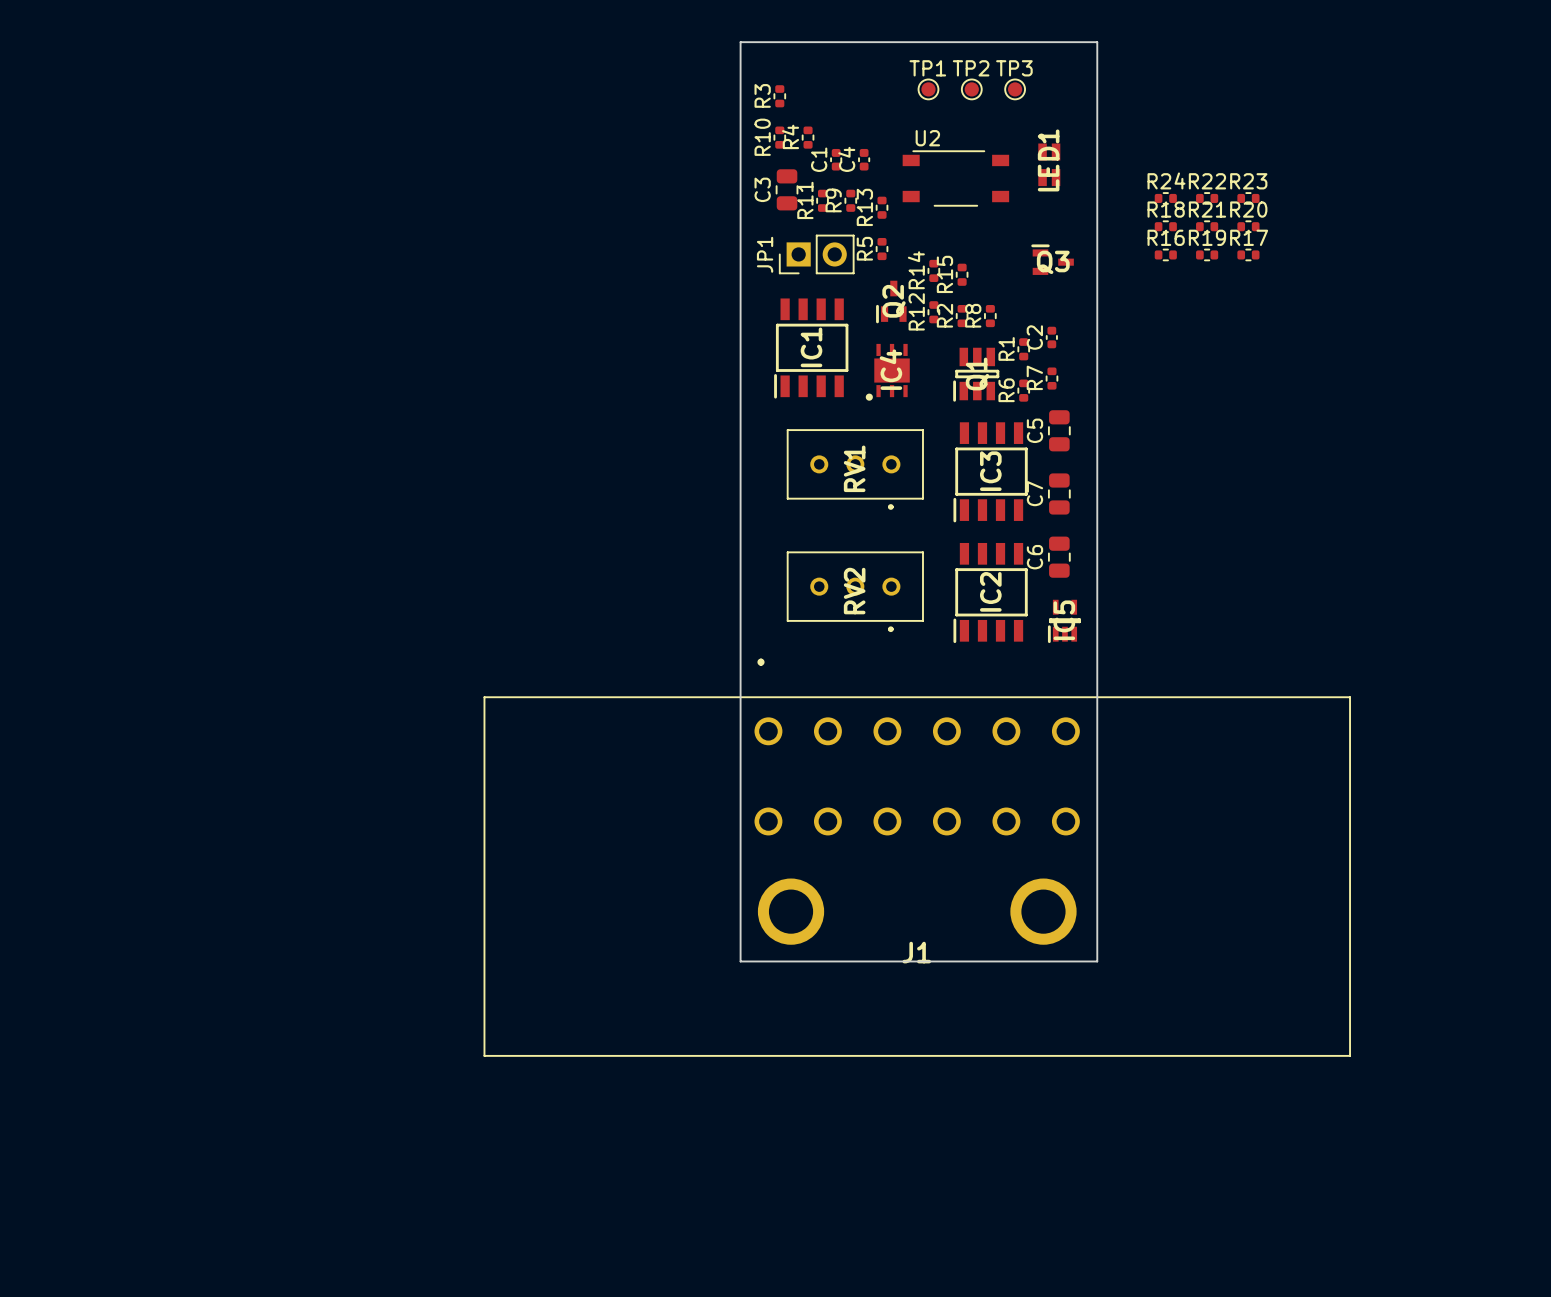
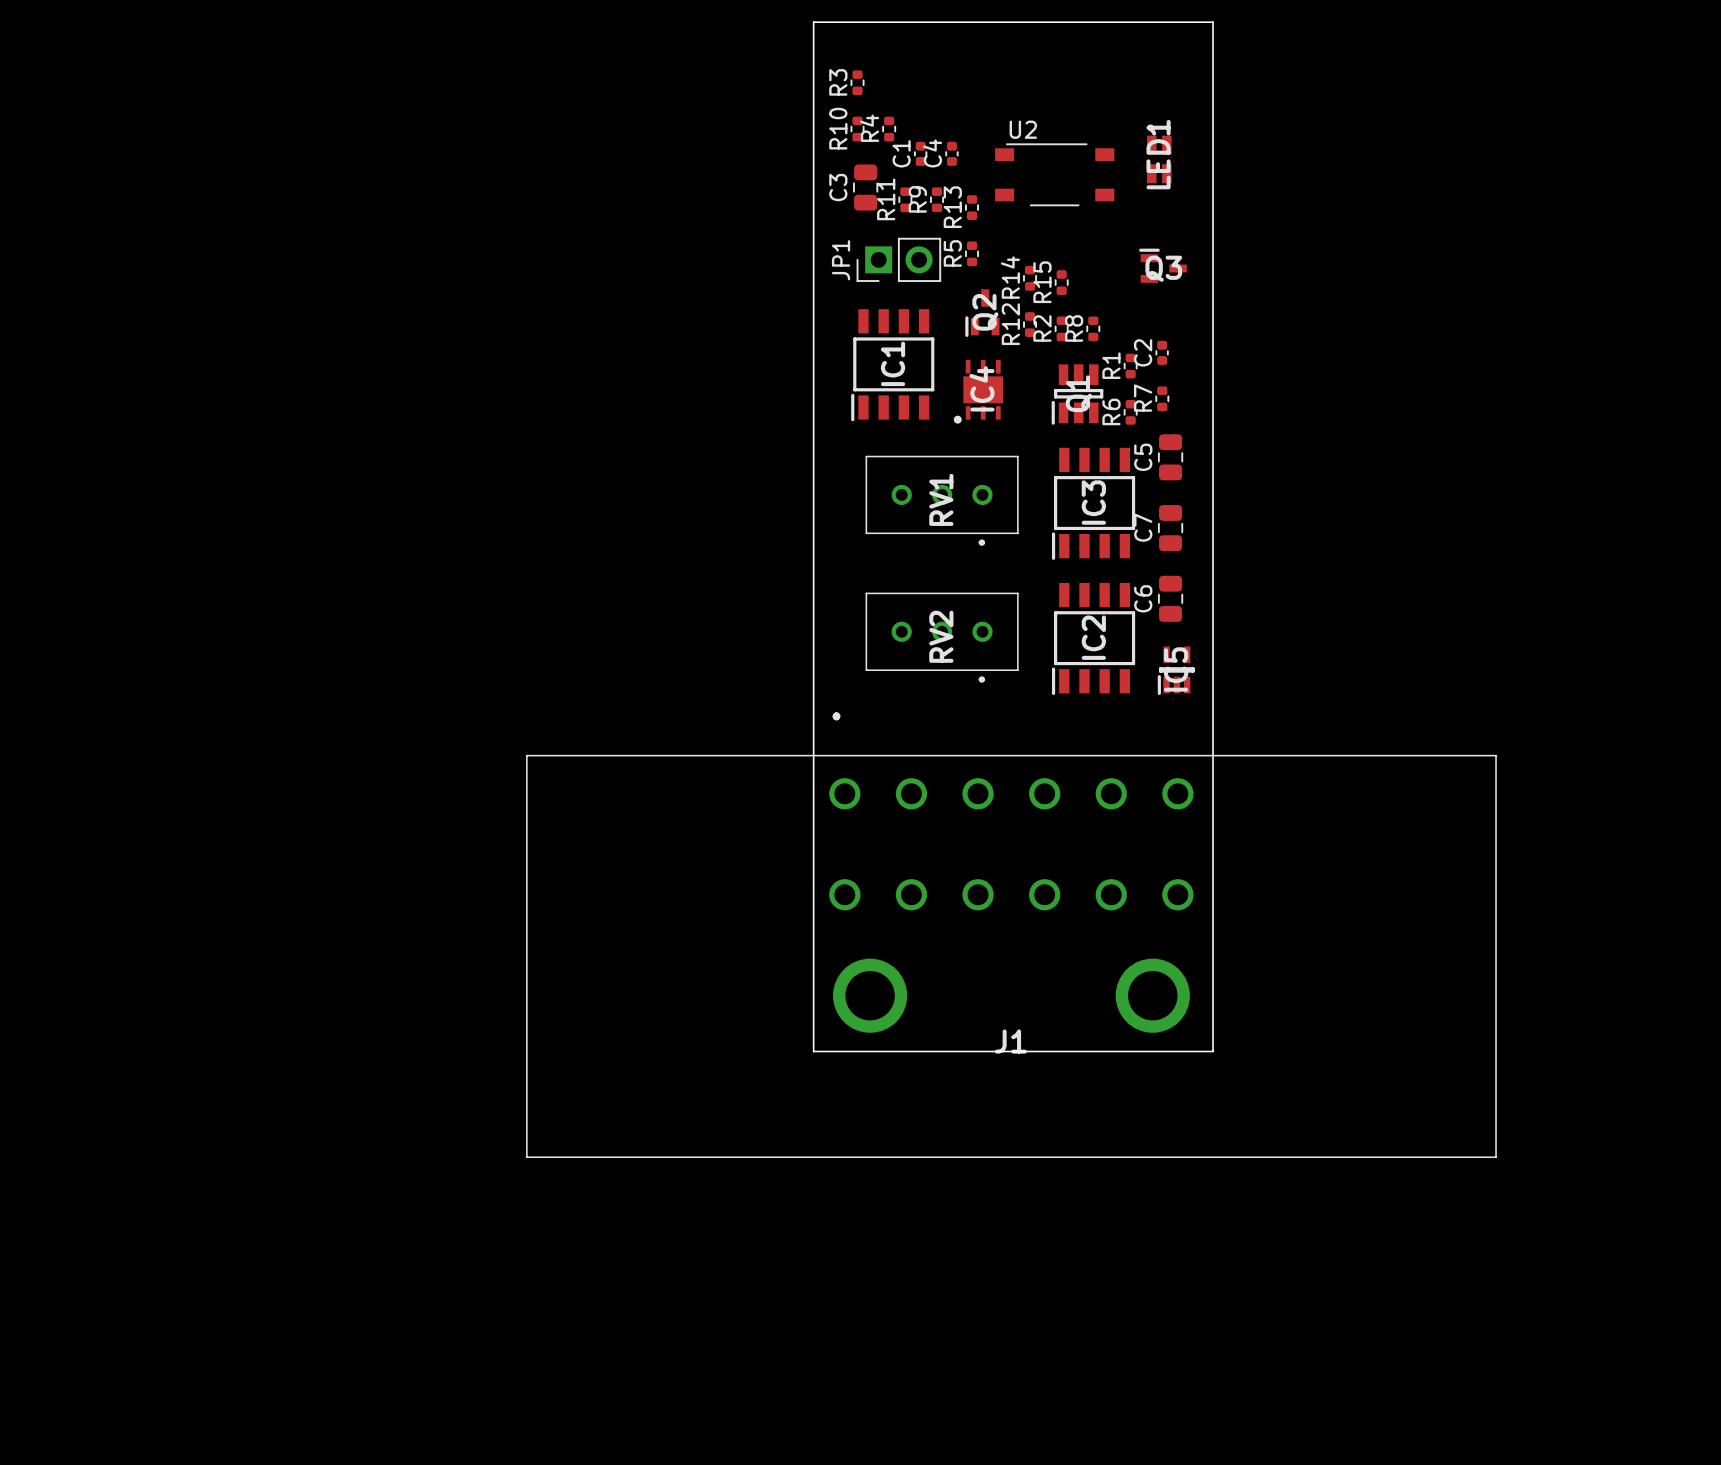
TP1: (928, 89) -> none
TP2: (971, 89) -> none
TP3: (1015, 89) -> none
R24: (1165, 198) -> none
R22: (1207, 198) -> none
R23: (1248, 198) -> none
R18: (1165, 226) -> none
R21: (1207, 226) -> none
R20: (1248, 226) -> none
R16: (1165, 254) -> none
R19: (1207, 254) -> none
R17: (1248, 254) -> none

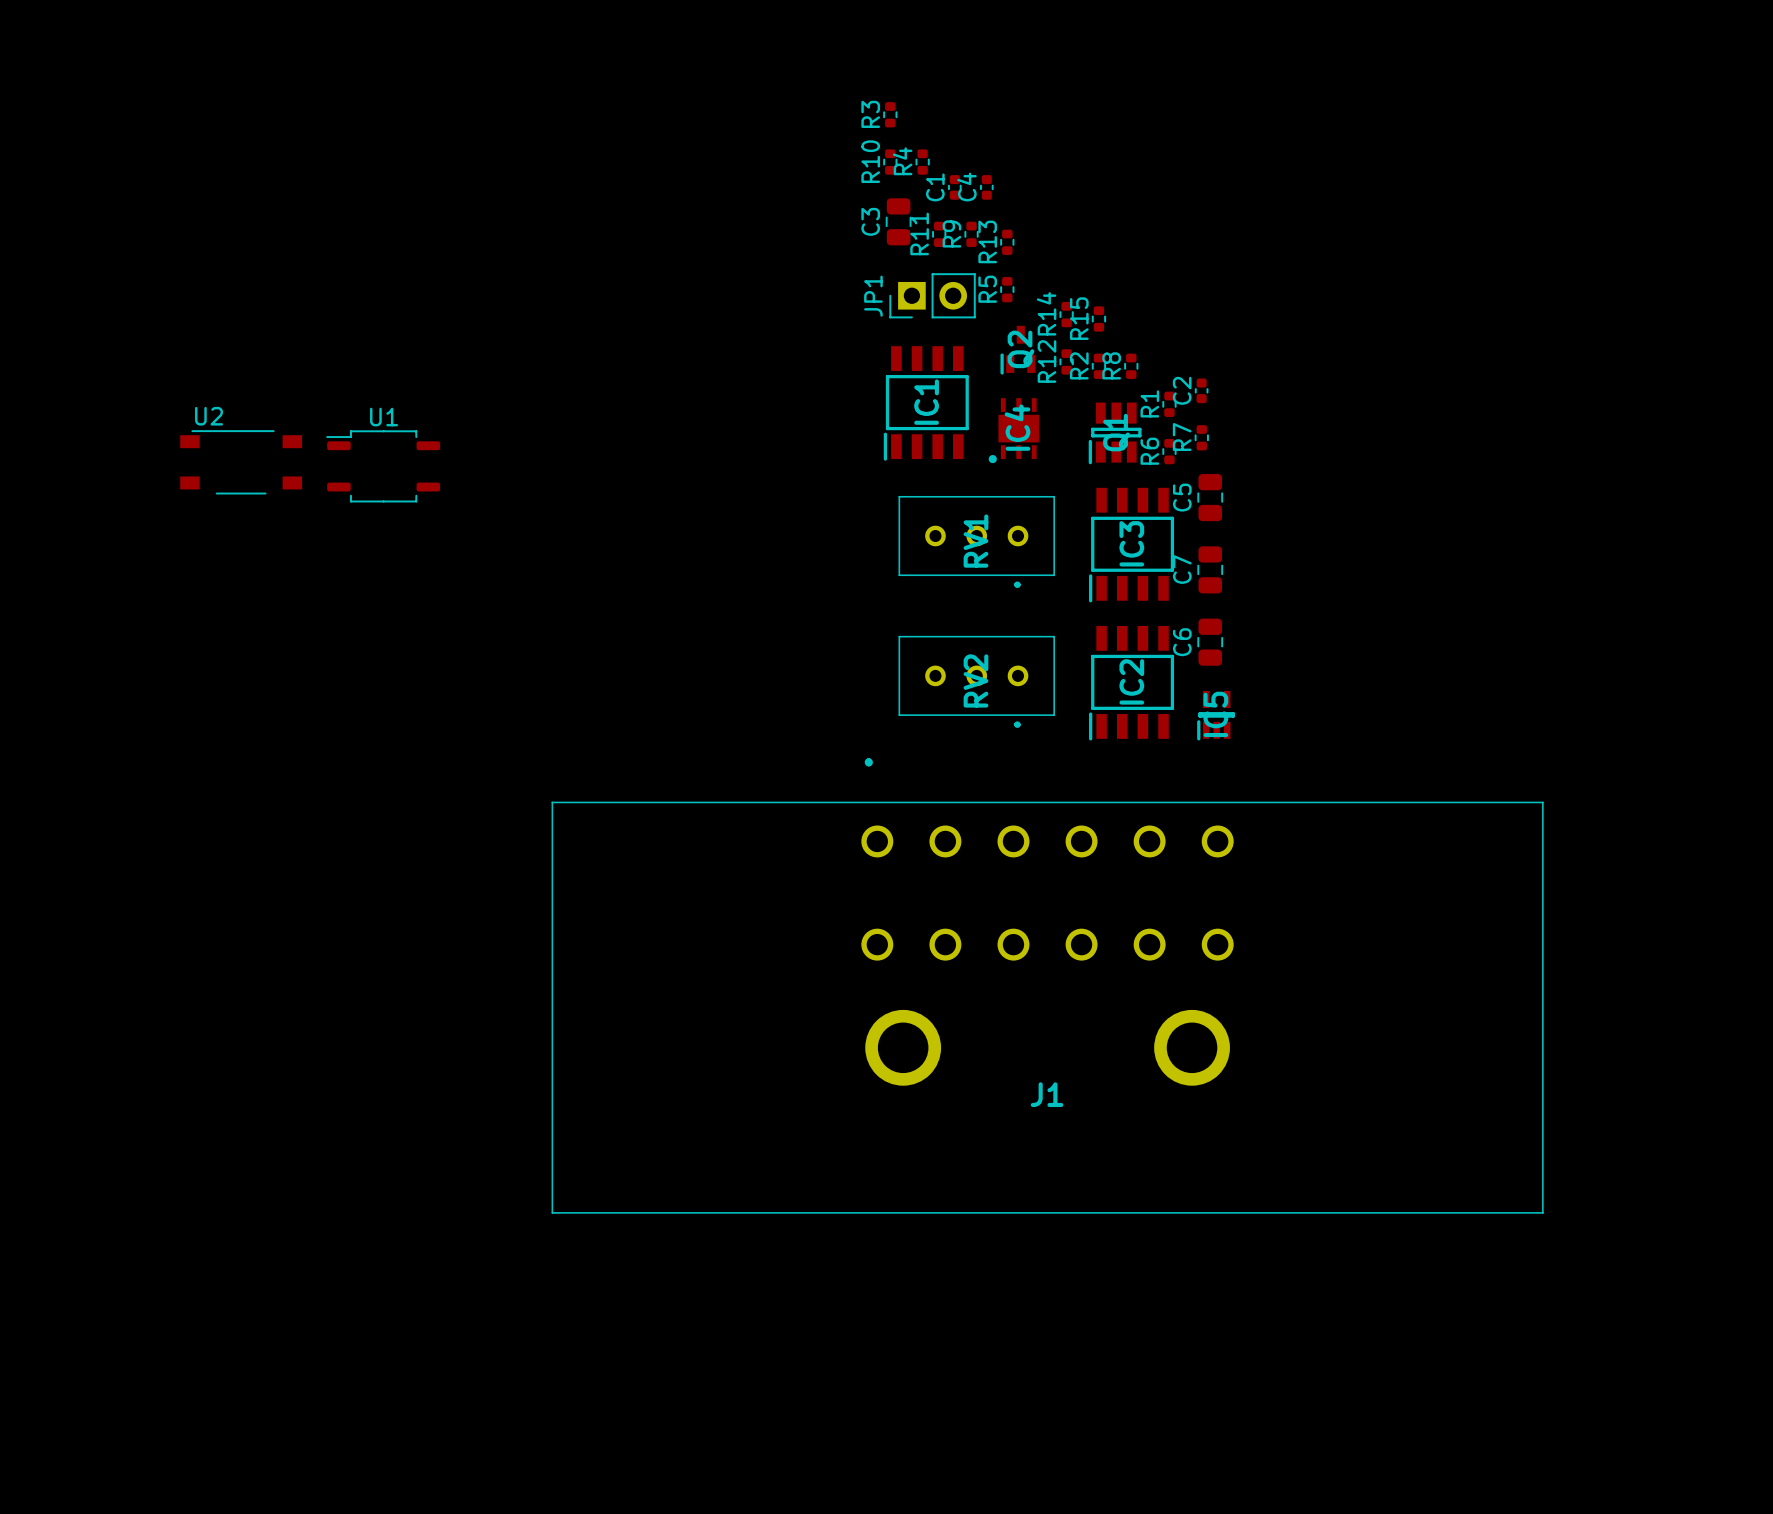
board edge: (813, 22) (1213, 22) (1213, 1051) (813, 1051) (813, 22) -> none
LED1: (1159, 153) -> none
U2 position: (1054, 174) -> (241, 462)
Q3: (1162, 265) -> none
U1: none -> (383, 466)

